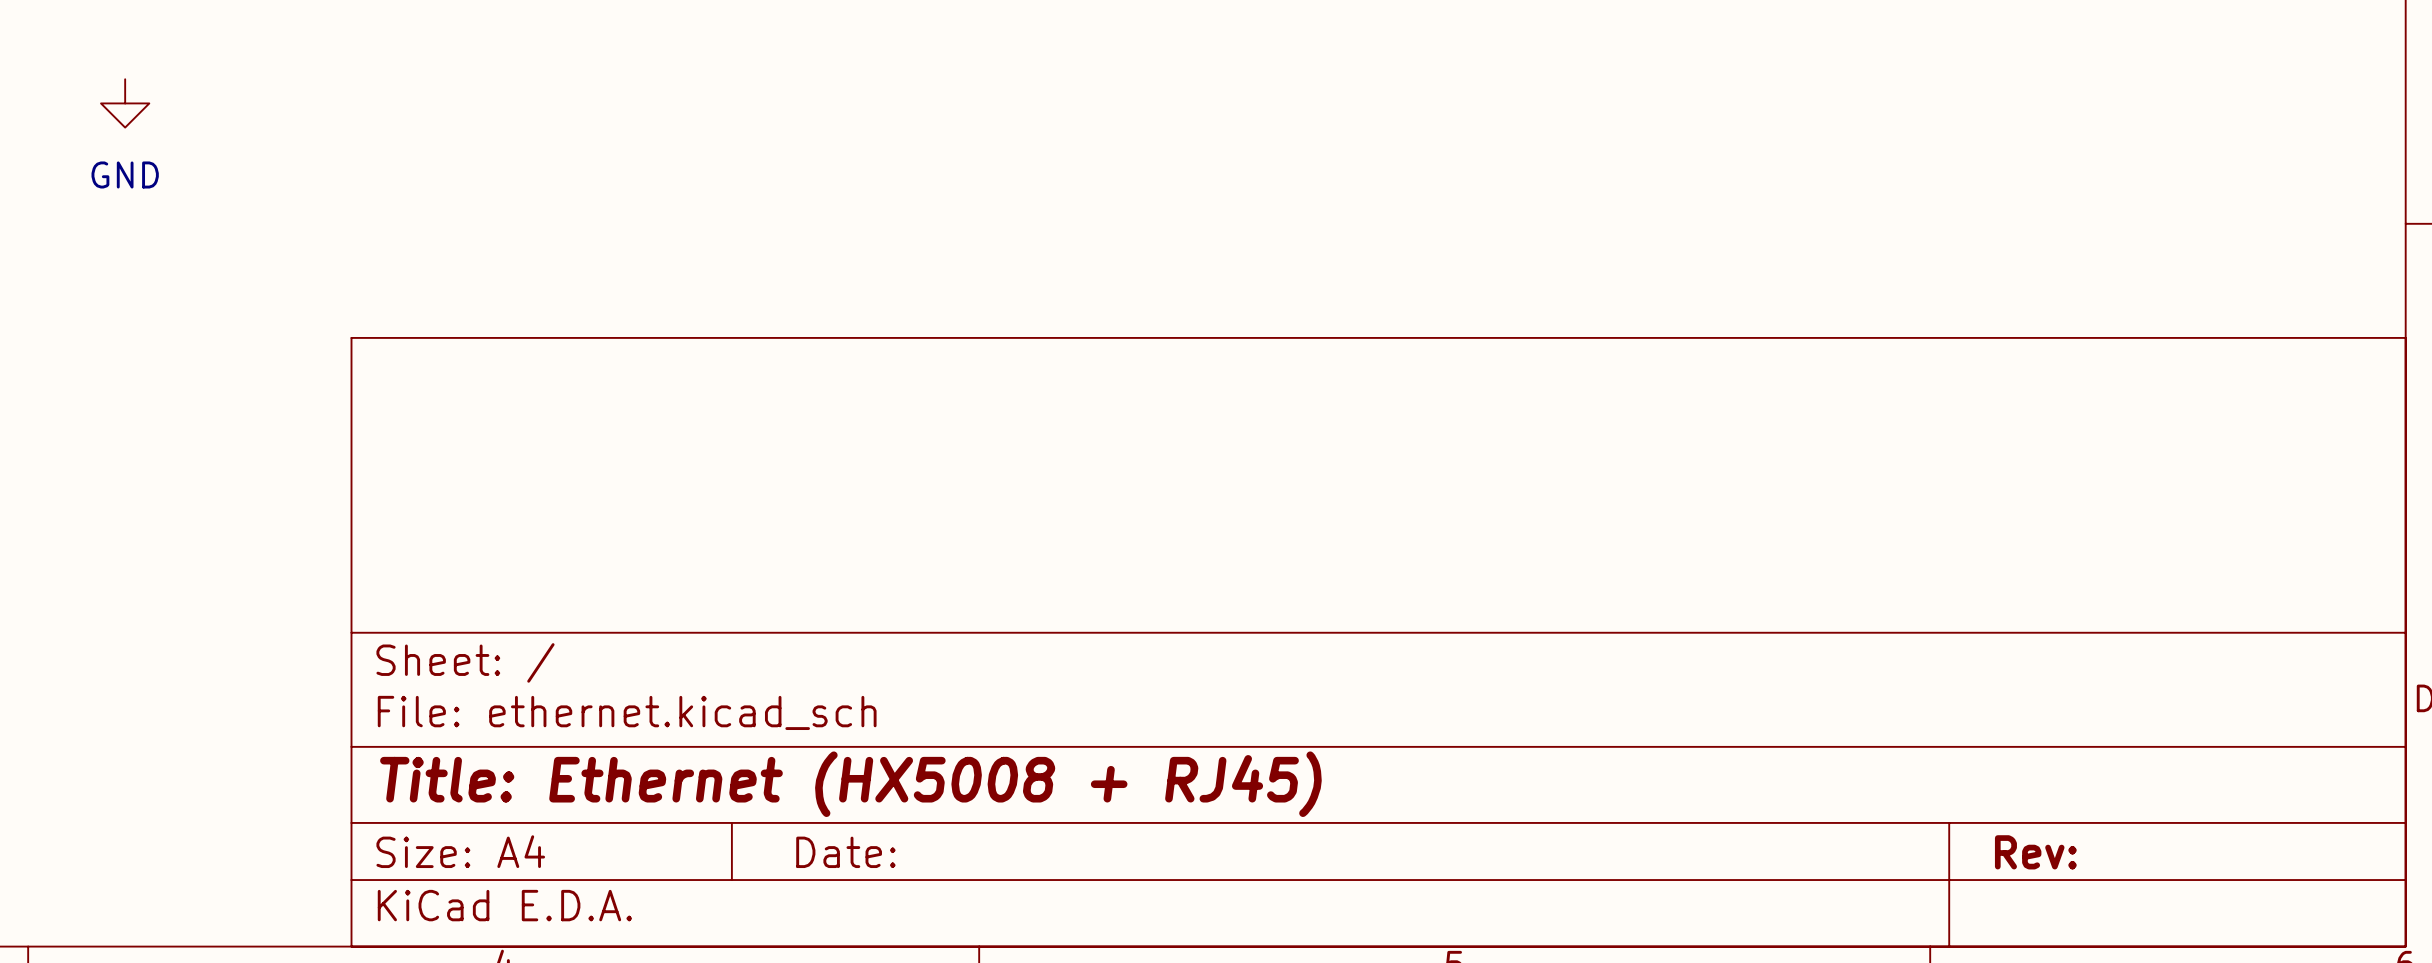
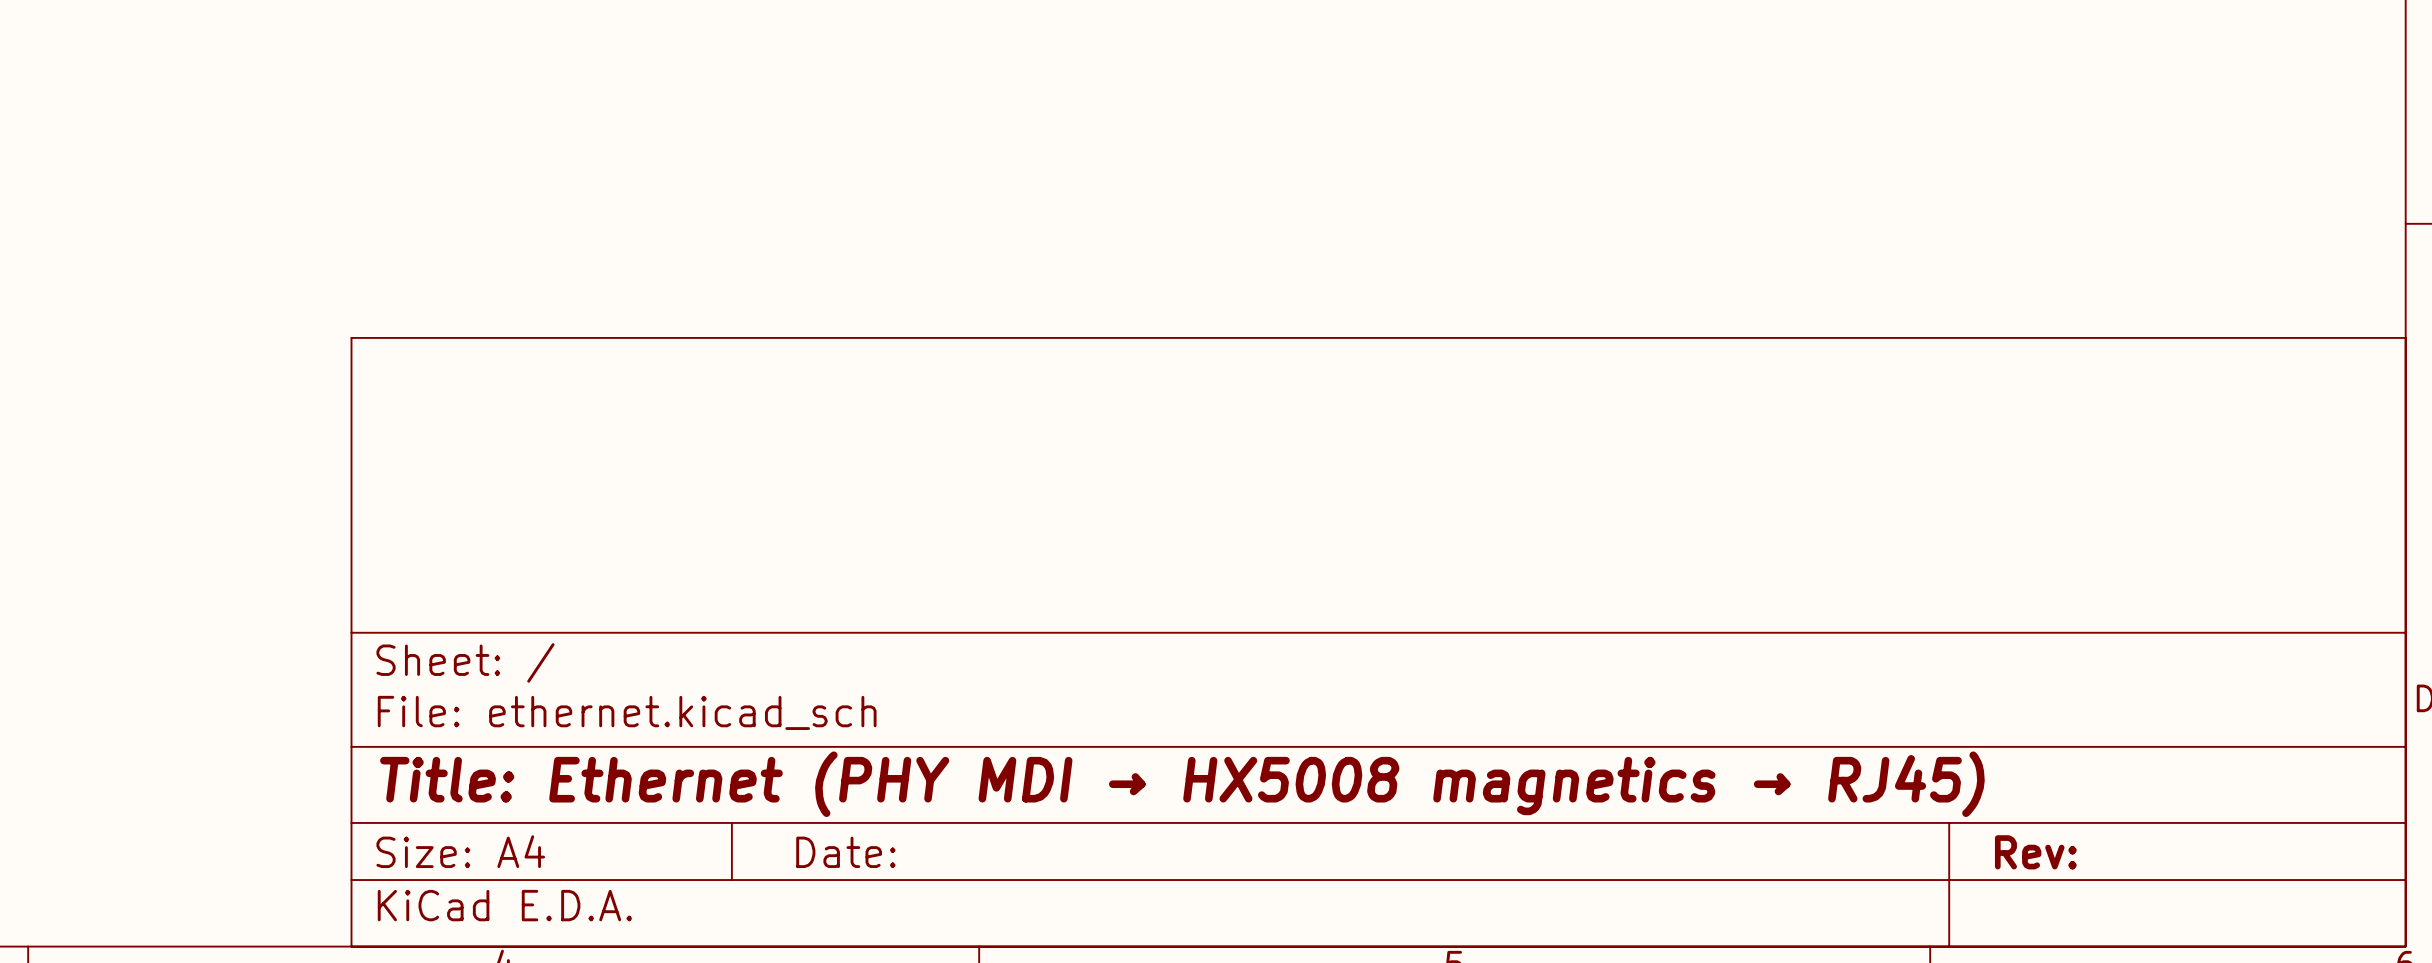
power symbol: GND (125, 103) -> none
title block: Title: Ethernet (HX5008 + RJ45) (850, 784) -> Title: Ethernet (PHY MDI → HX5008 magnetics → RJ45) (1182, 784)

